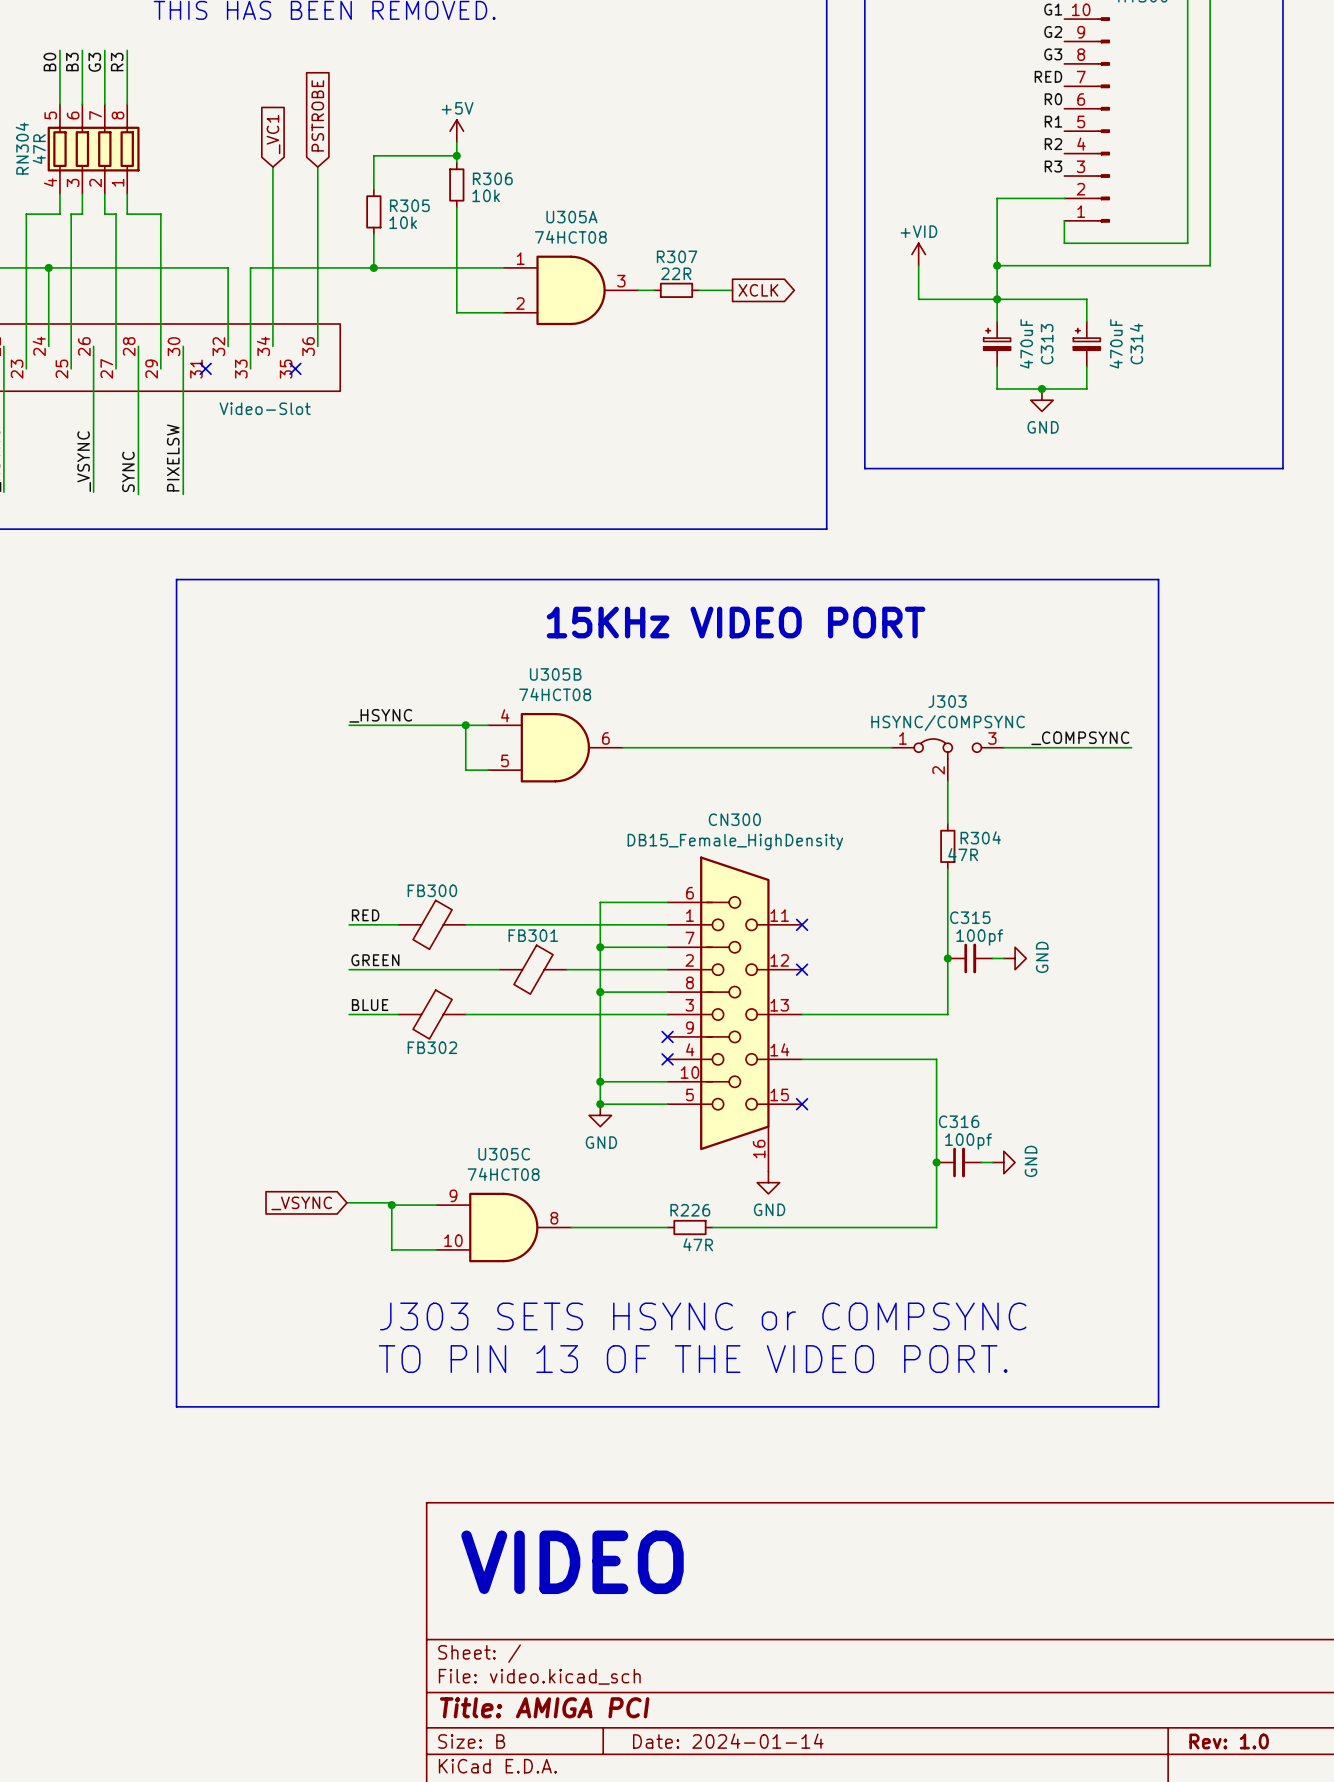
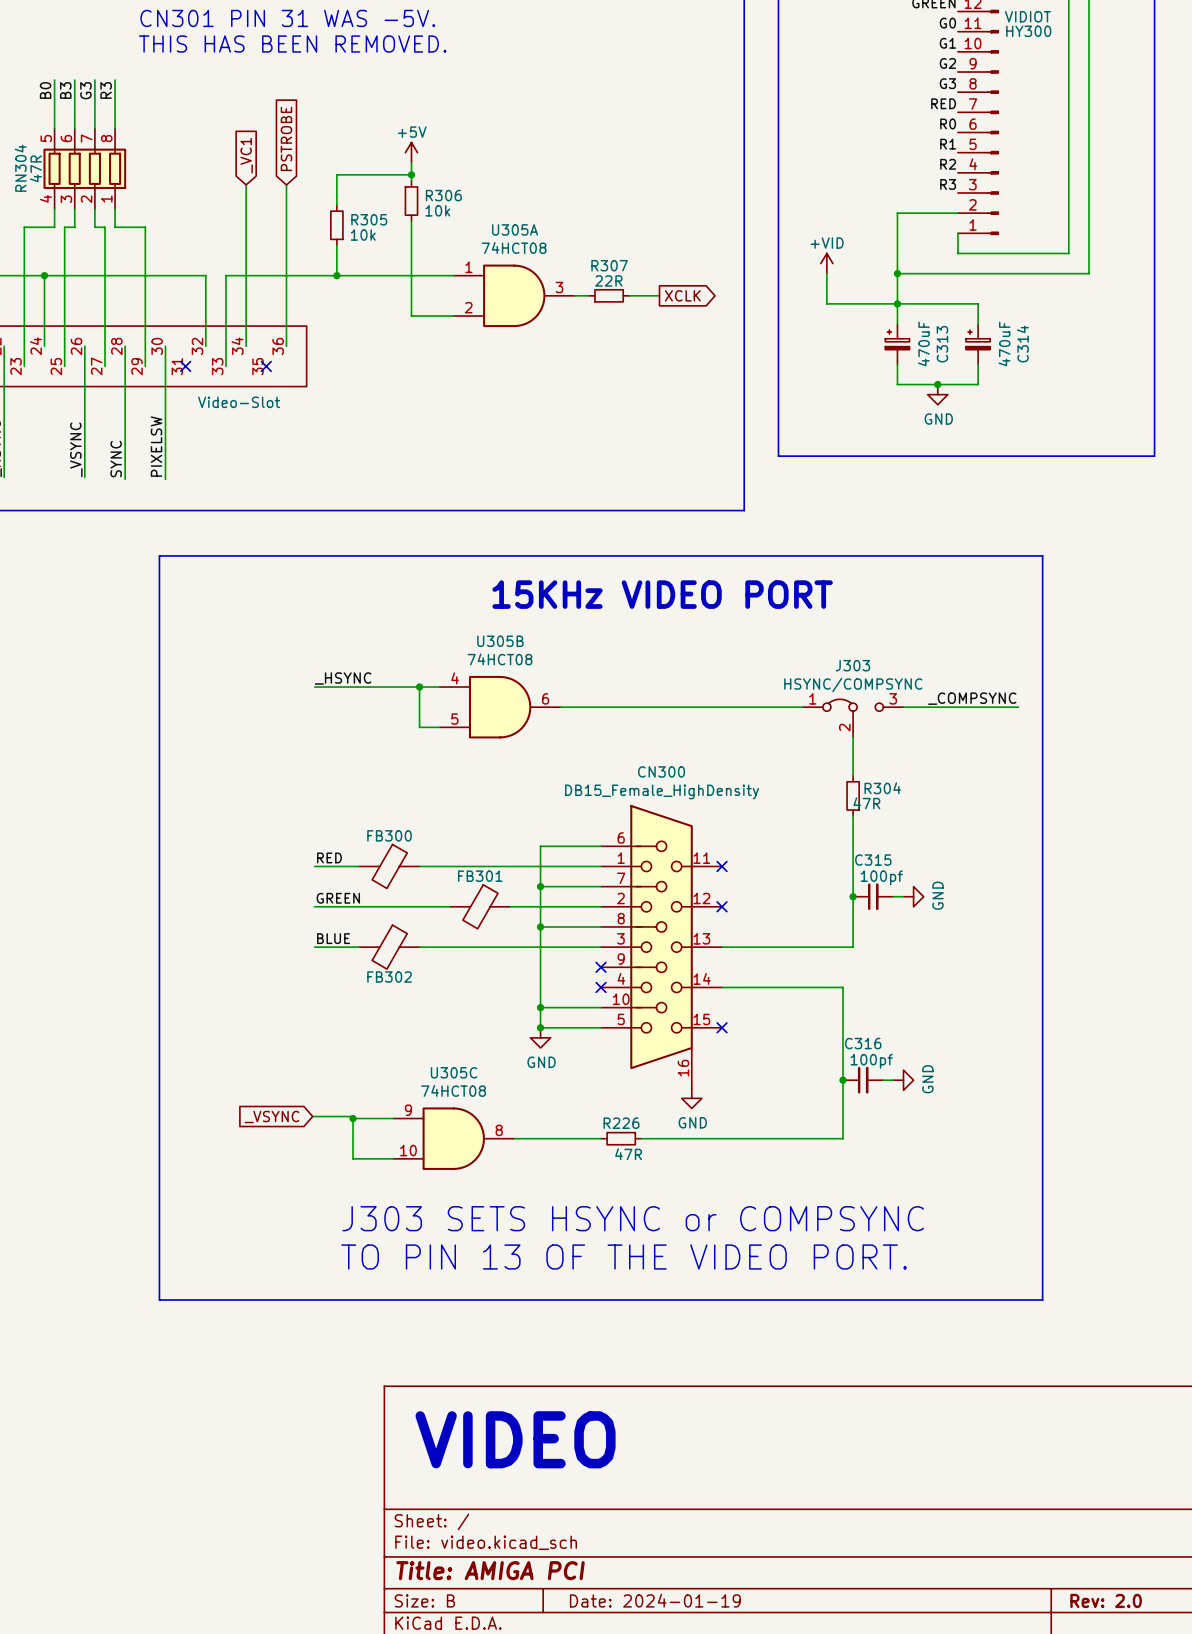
title block: Date: 2024-01-14 (728, 1741) -> Date: 2024-01-19 (655, 1600)
title block: Rev: 1.0 (1229, 1741) -> Rev: 2.0 (1106, 1600)

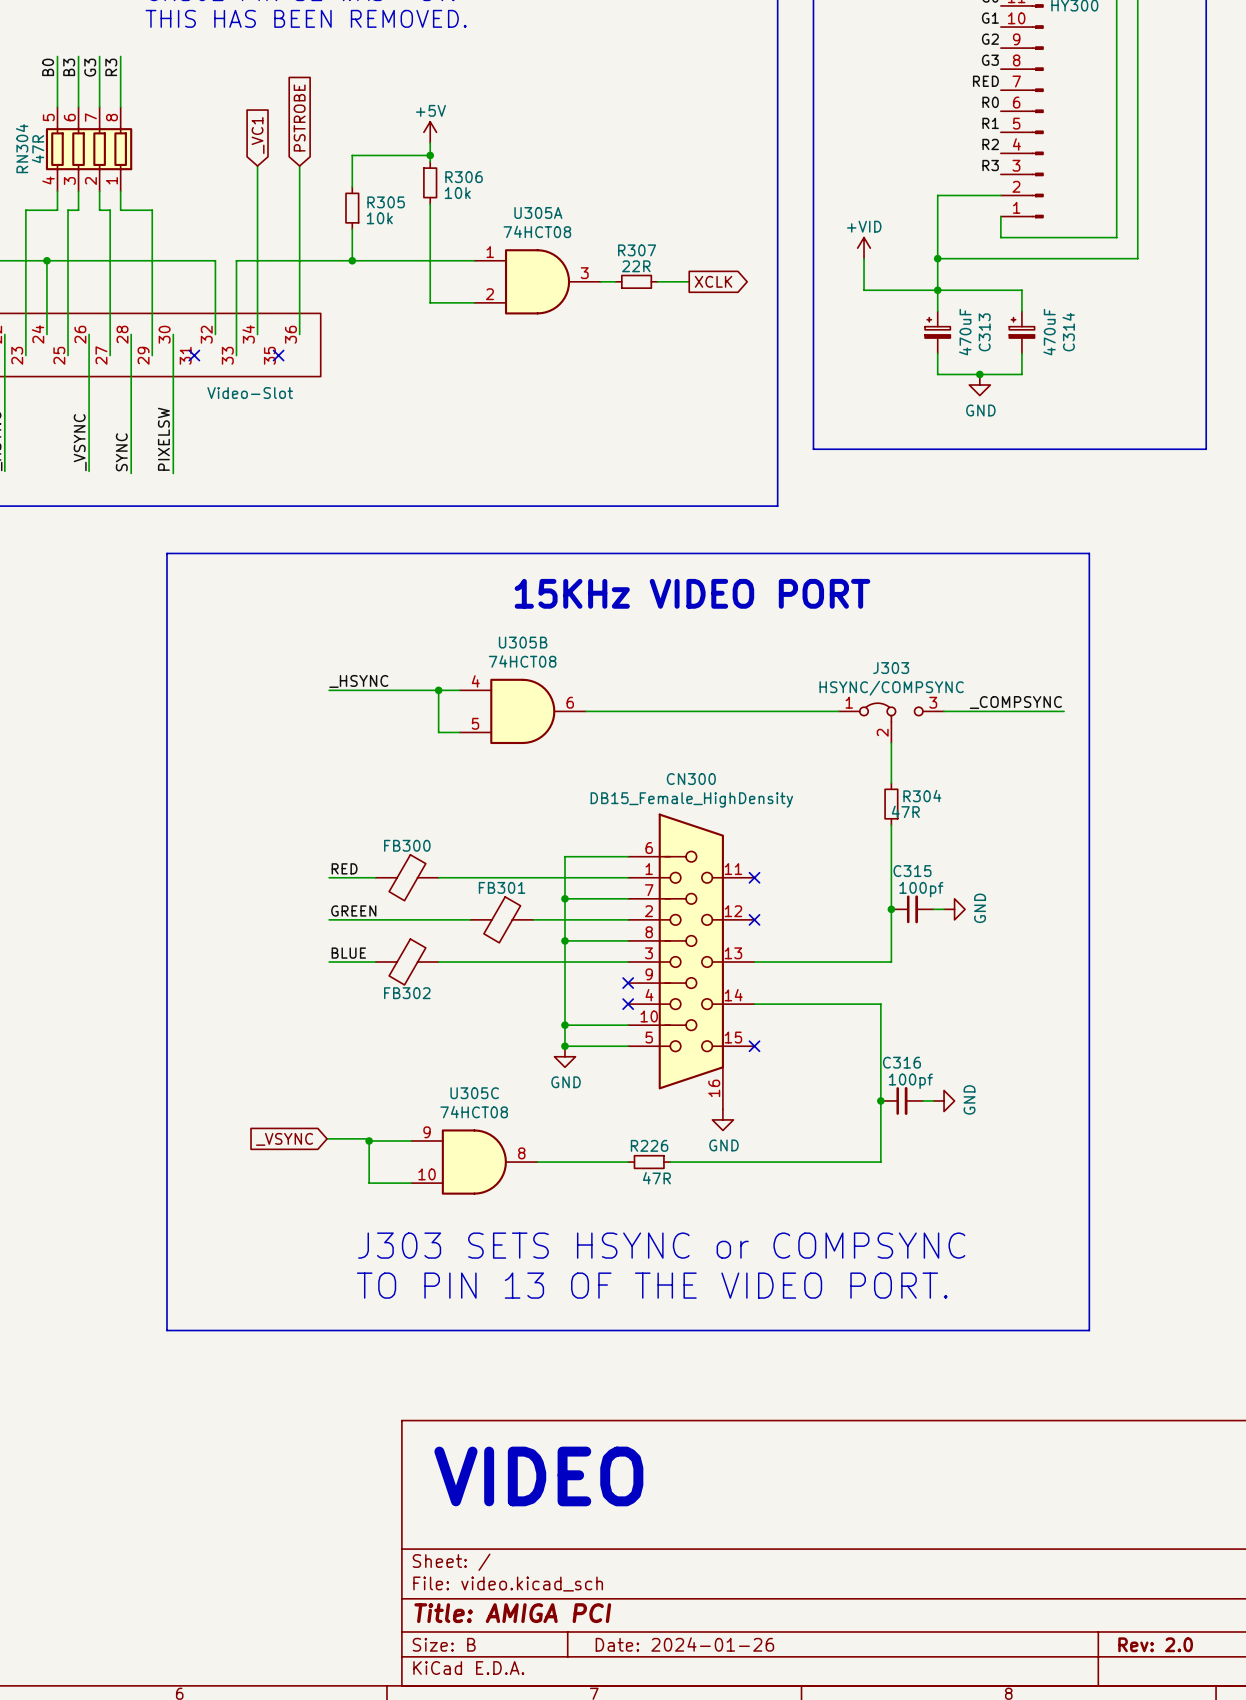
title block: Date: 2024-01-19 (655, 1600) -> Date: 2024-01-26 (684, 1644)

